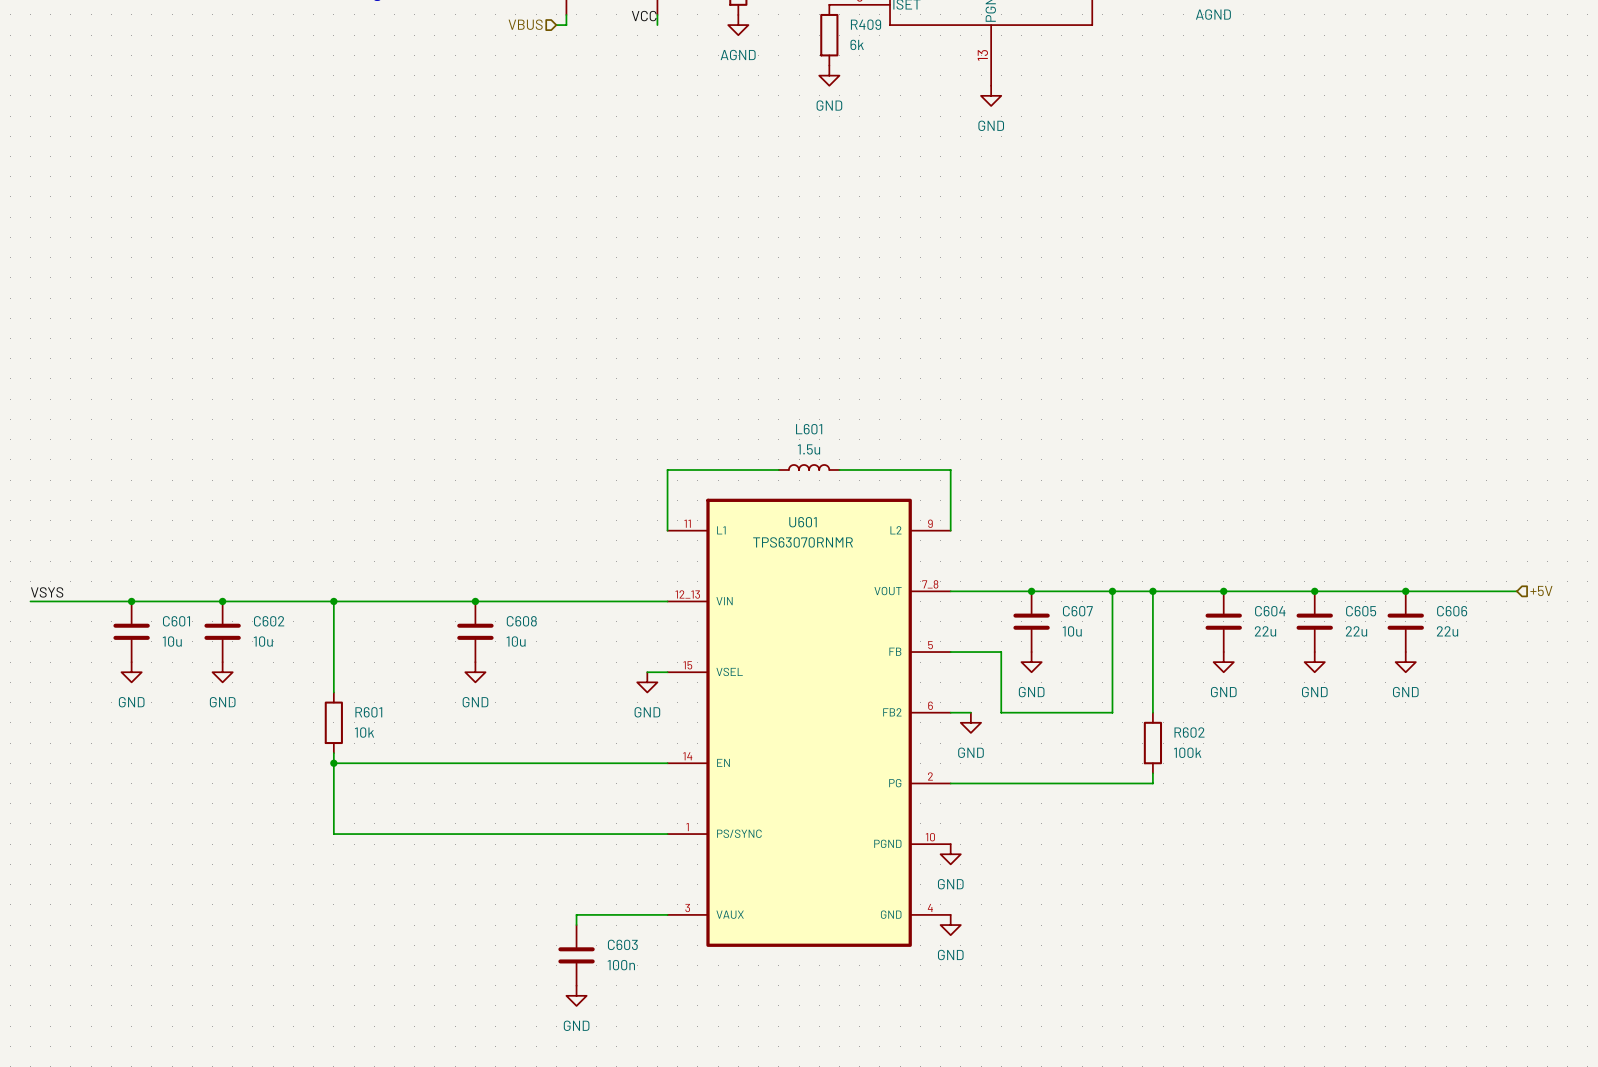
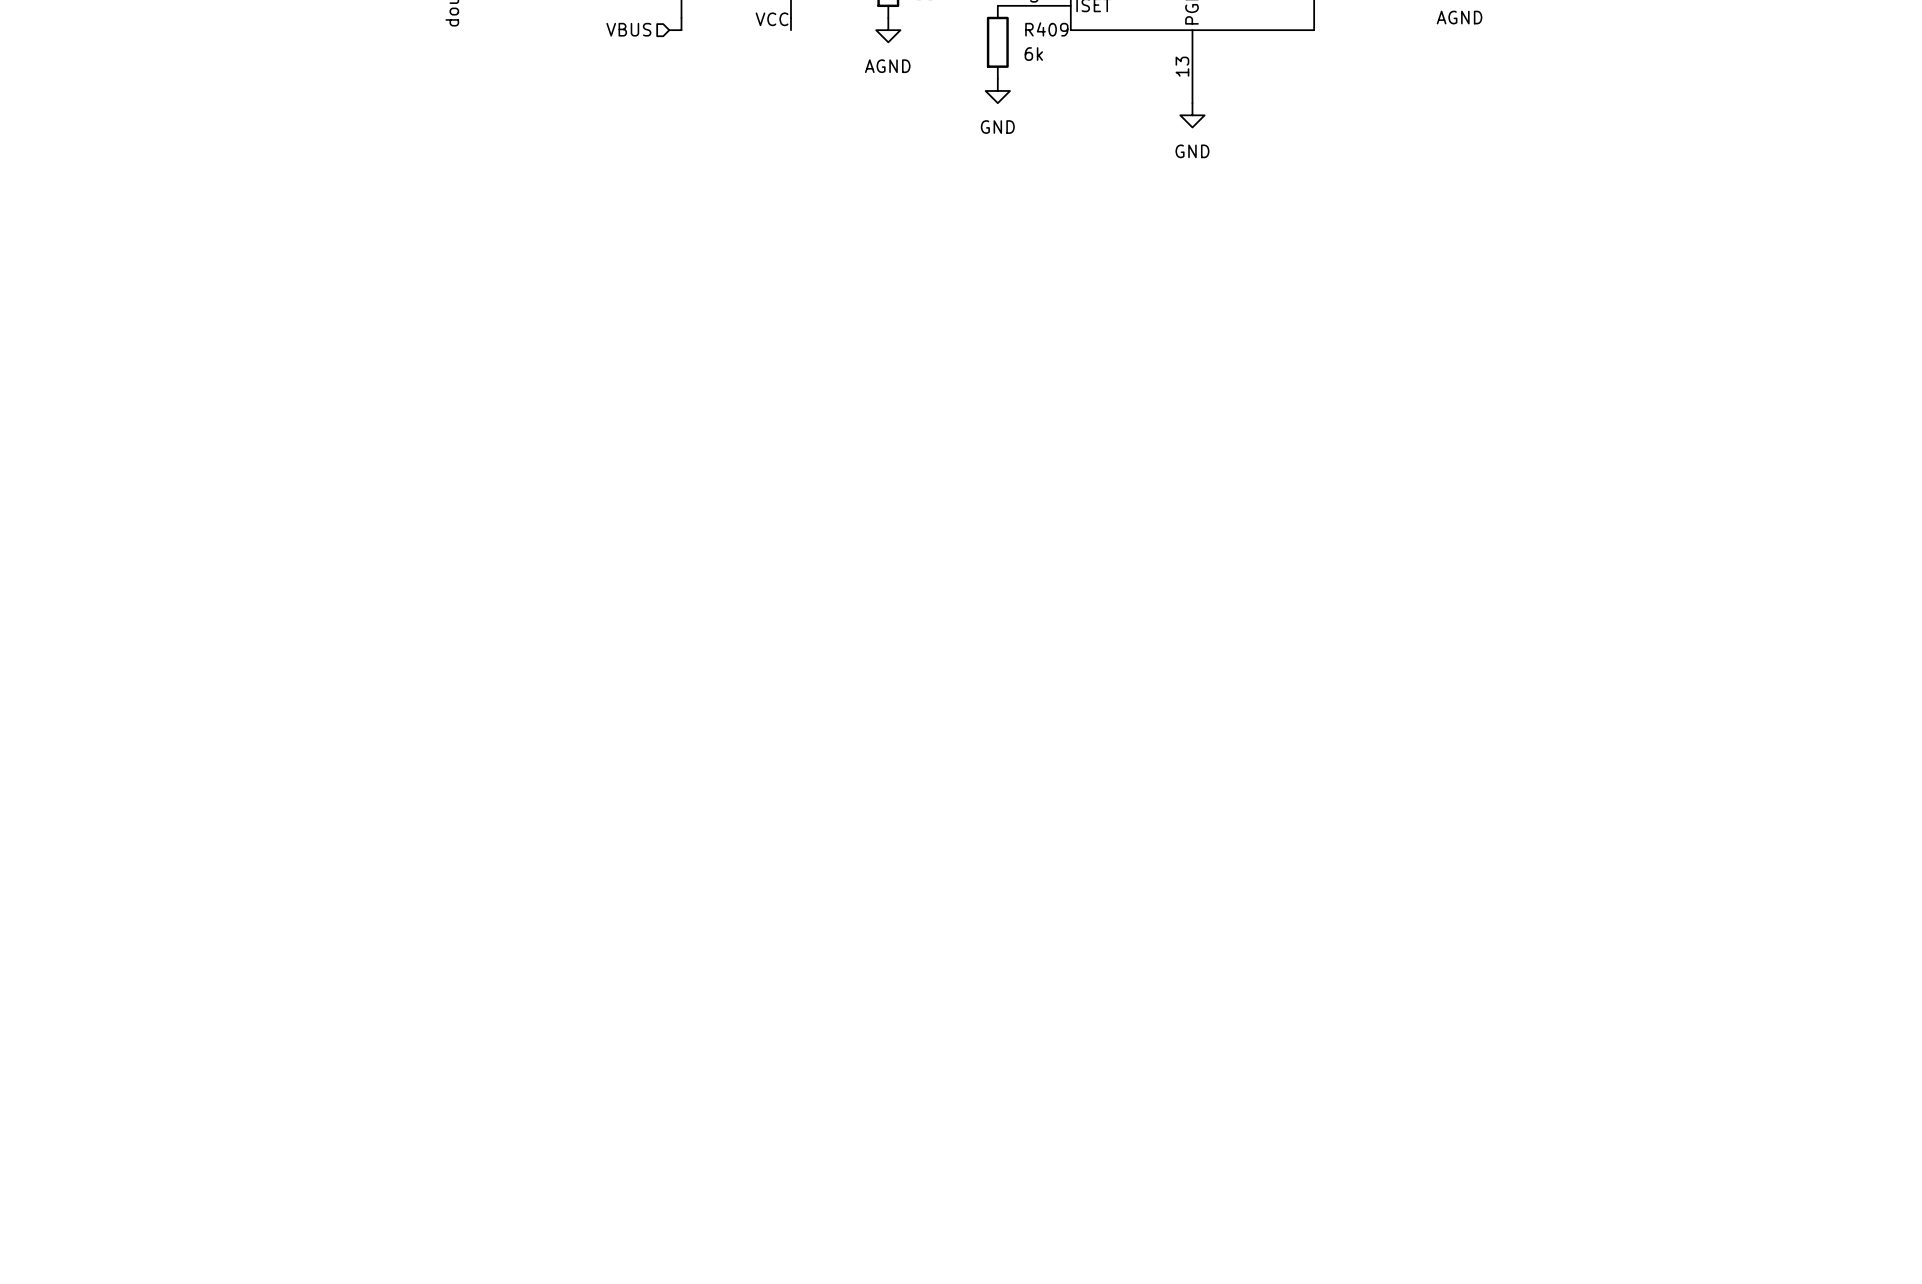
L601: 1.5u (809, 467) -> none
wire: (778, 470) (667, 470) (667, 530) -> none
wire: (839, 470) (950, 470) (950, 530) -> none
wire: (950, 591) (1516, 591) -> none
junction: (1031, 591) -> none
wire: (1112, 591) (1112, 712) (1001, 712) (1001, 652) (950, 652) -> none
junction: (1112, 591) -> none
wire: (1152, 591) (1152, 712) -> none
junction: (1152, 591) -> none
junction: (1223, 591) -> none
junction: (1314, 591) -> none
junction: (1405, 591) -> none
hierarchical label: +5V (1541, 591) -> none
label: VSYS (47, 592) -> none
wire: (30, 601) (667, 601) -> none
junction: (131, 601) -> none
junction: (222, 601) -> none
wire: (333, 601) (333, 692) -> none
junction: (333, 601) -> none
junction: (475, 601) -> none
C607: 10u (1031, 621) -> none
C604: 22u (1223, 621) -> none
C605: 22u (1314, 621) -> none
C606: 22u (1405, 621) -> none
C601: 10u (131, 631) -> none
C602: 10u (222, 631) -> none
C608: 10u (475, 631) -> none
power symbol: GND (1031, 662) -> none
power symbol: GND (1223, 662) -> none
power symbol: GND (1314, 662) -> none
power symbol: GND (1405, 662) -> none
power symbol: GND (131, 672) -> none
power symbol: GND (222, 672) -> none
power symbol: GND (475, 672) -> none
wire: (647, 672) (667, 672) -> none
power symbol: GND (647, 682) -> none
wire: (950, 712) (970, 712) -> none
R601: 10k (333, 722) -> none
U601: TPS63070RNMR (809, 722) -> none
power symbol: GND (970, 722) -> none
R602: 100k (1152, 743) -> none
wire: (333, 753) (333, 834) (667, 834) -> none
wire: (333, 763) (667, 763) -> none
junction: (333, 763) -> none
wire: (1152, 773) (1152, 783) (950, 783) -> none
power symbol: GND (950, 854) -> none
wire: (667, 914) (576, 914) (576, 925) -> none
power symbol: GND (950, 925) -> none
C603: 100n (576, 955) -> none
power symbol: GND (576, 995) -> none

